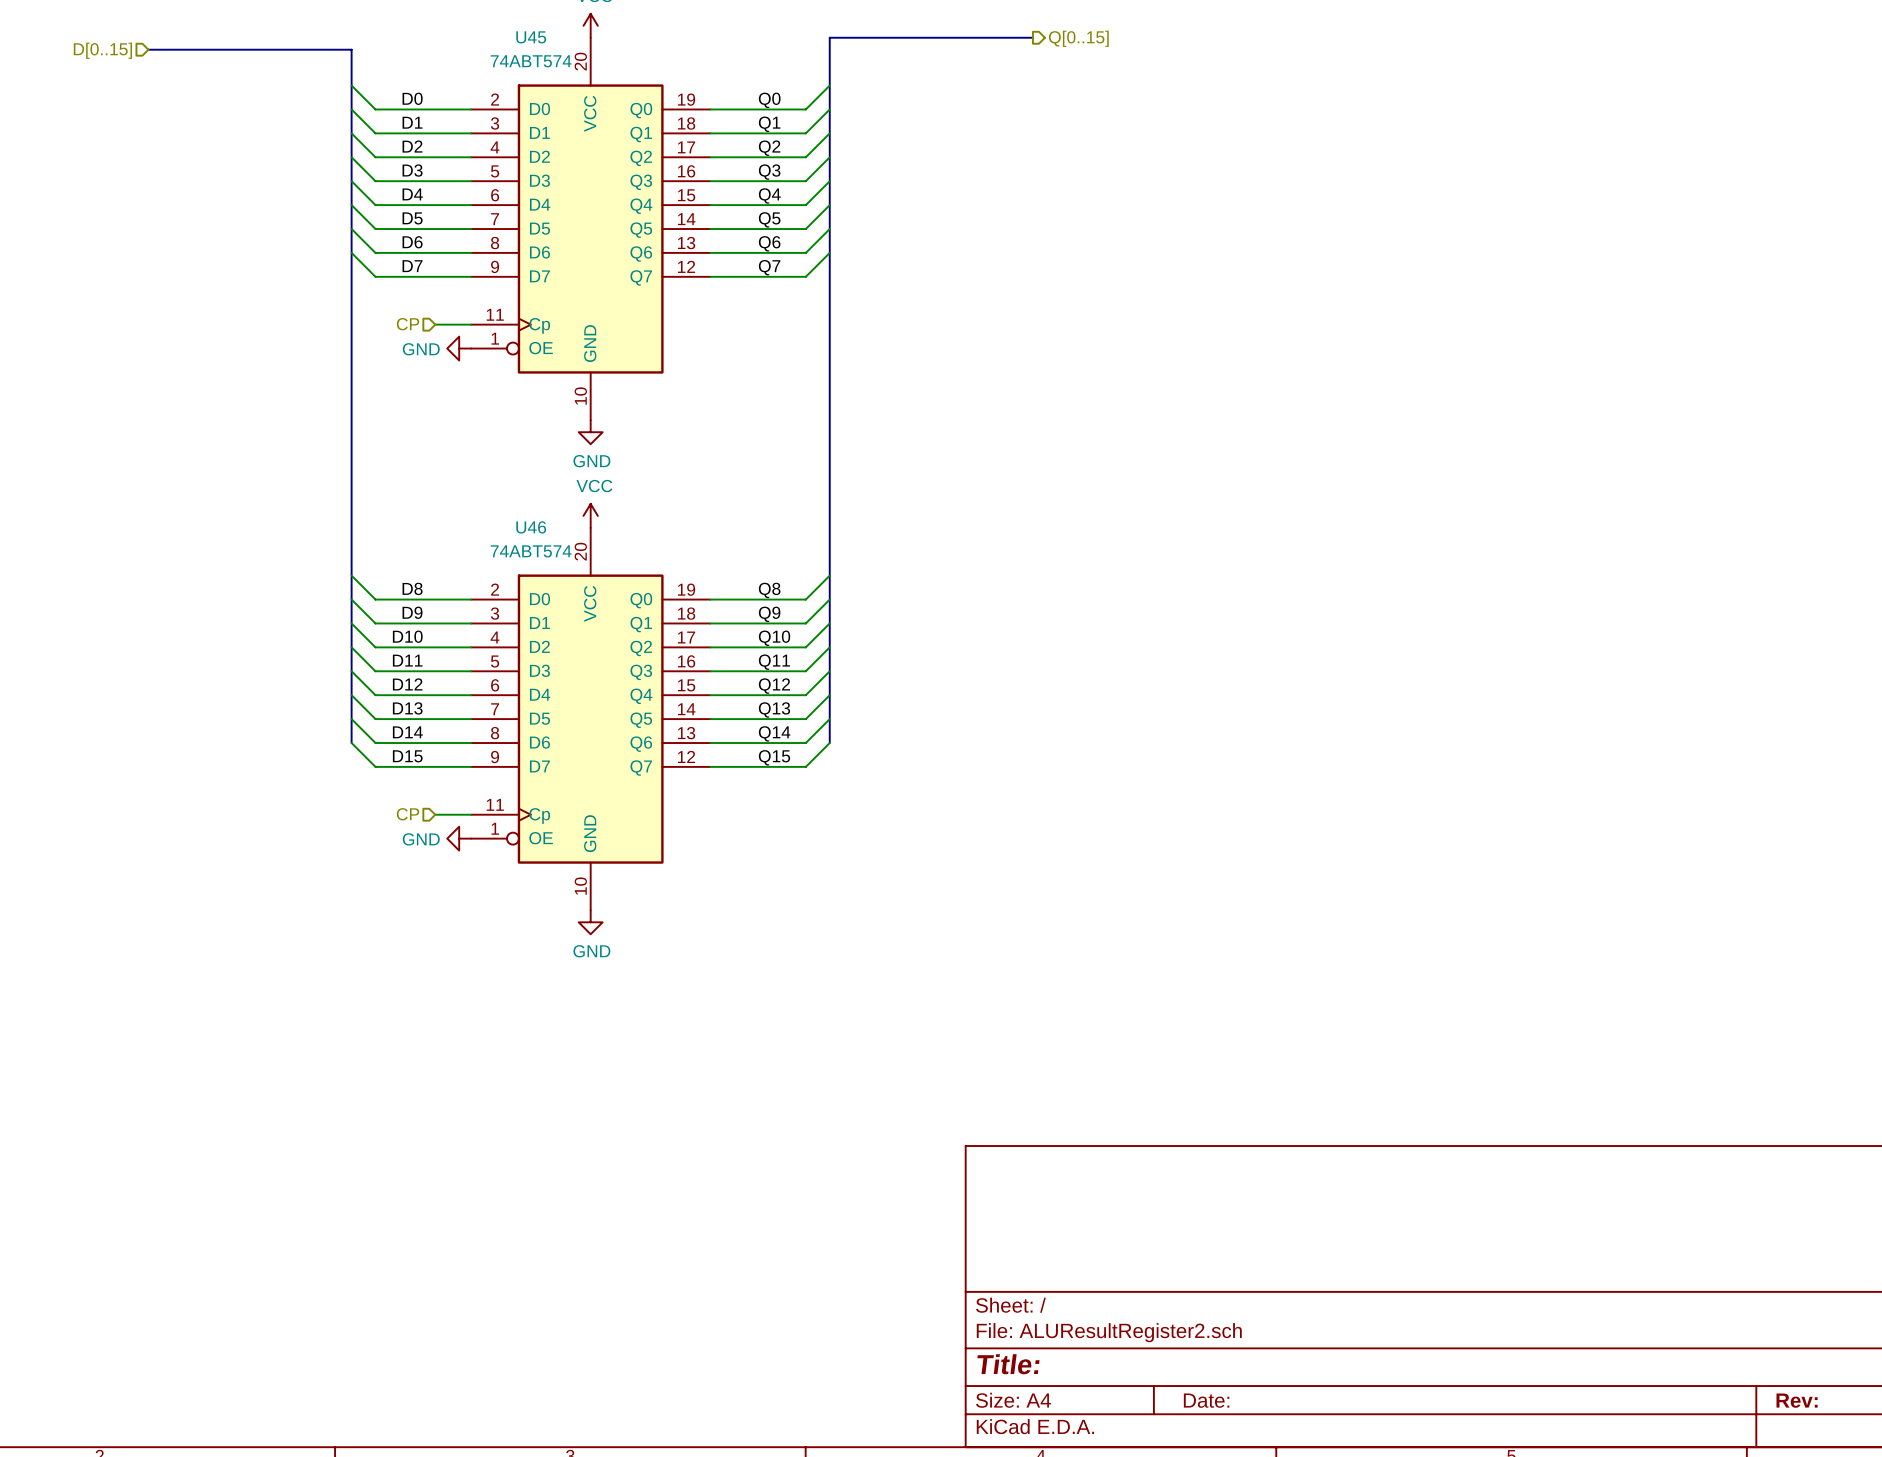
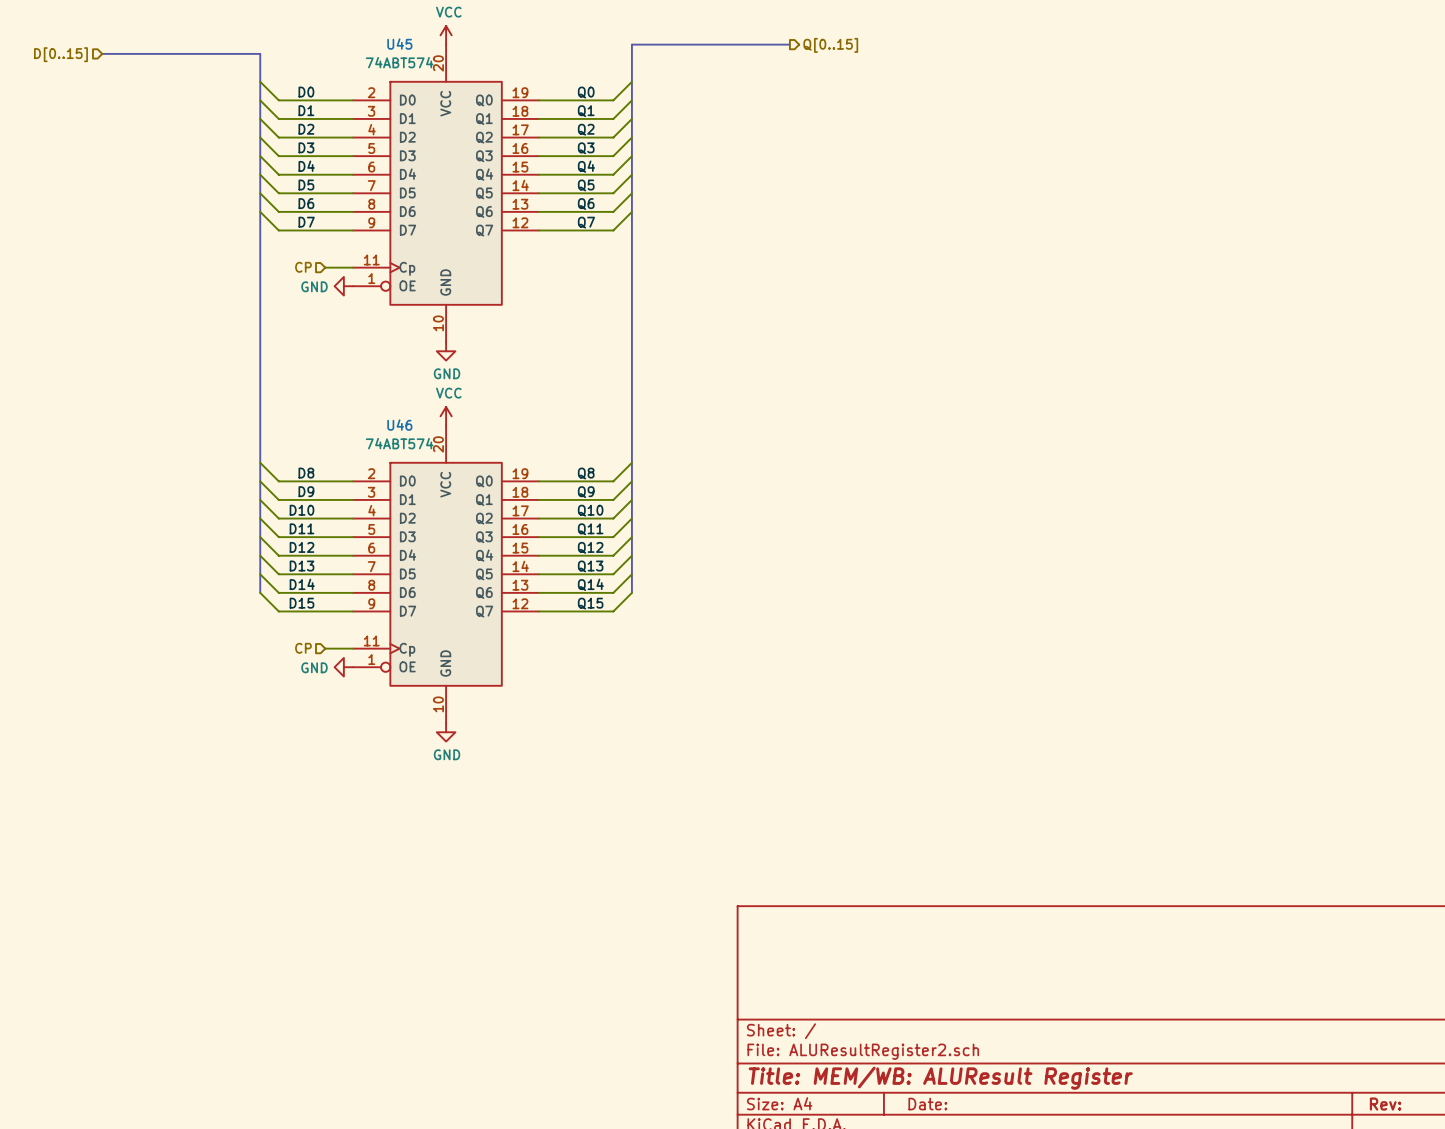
title block: Title: (1008, 1364) -> Title: MEM/WB: ALUResult Register (940, 1078)

